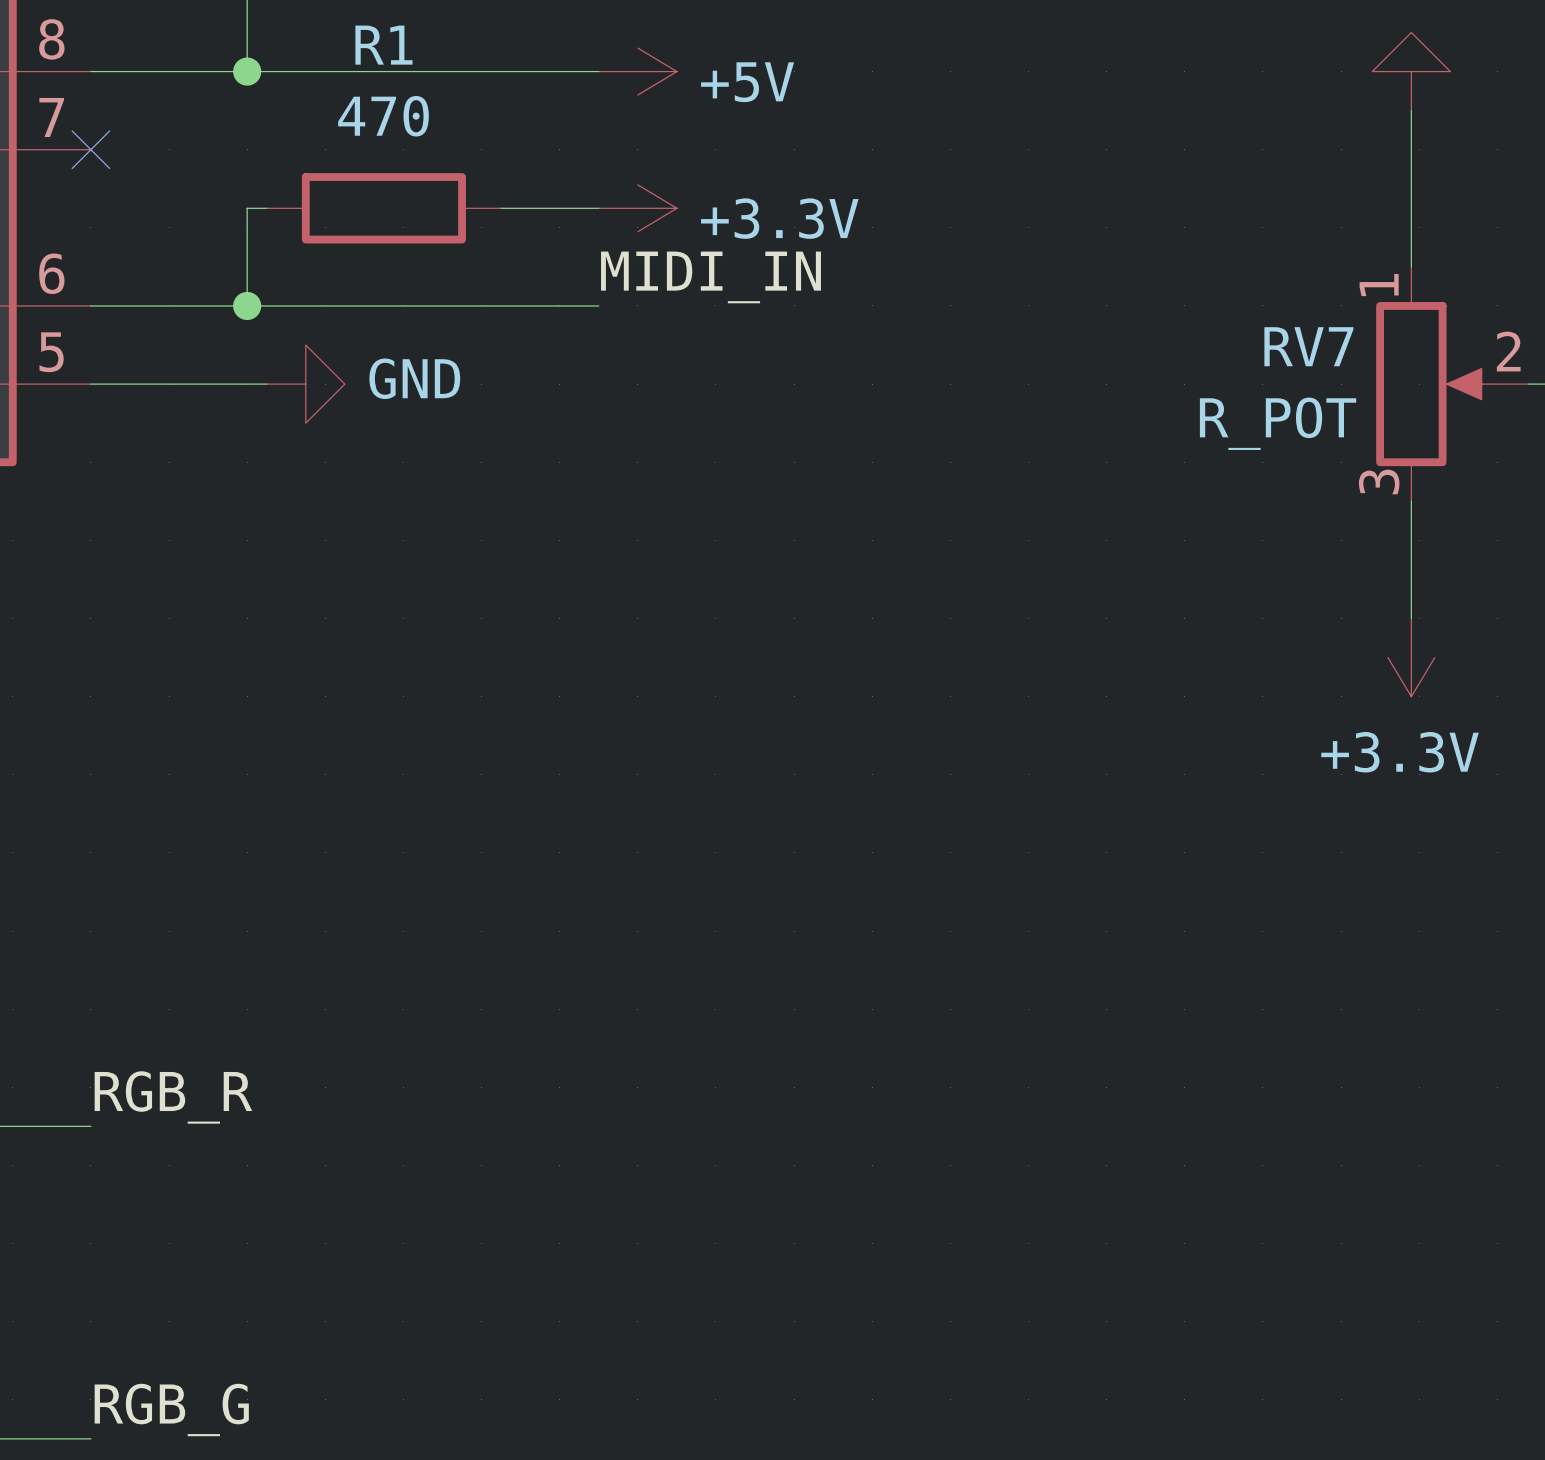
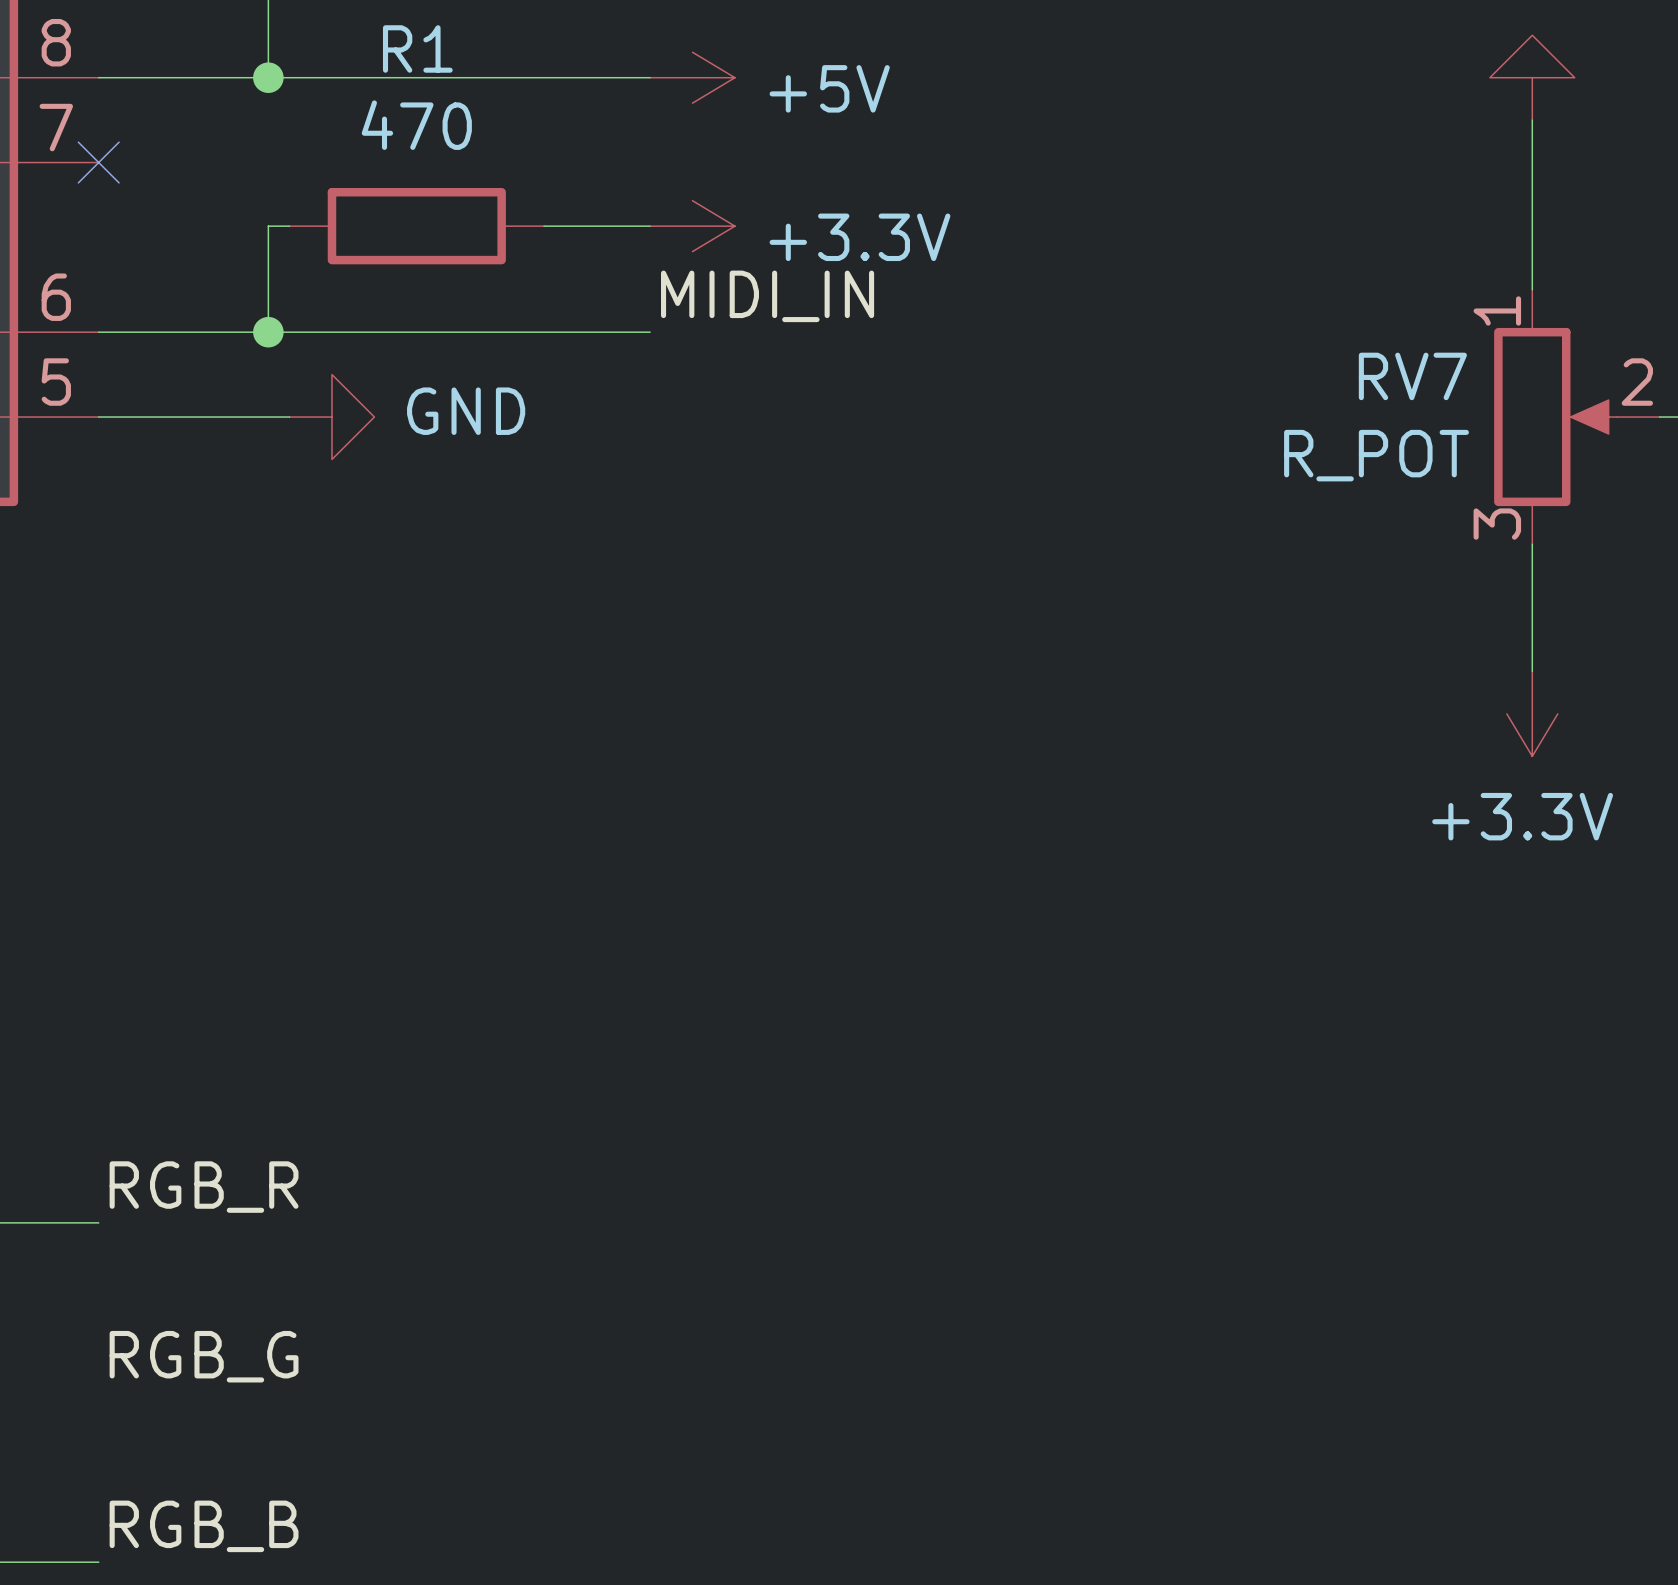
label: none -> RGB_G (204, 1356)
label: RGB_G (171, 1409) -> RGB_B (204, 1526)

